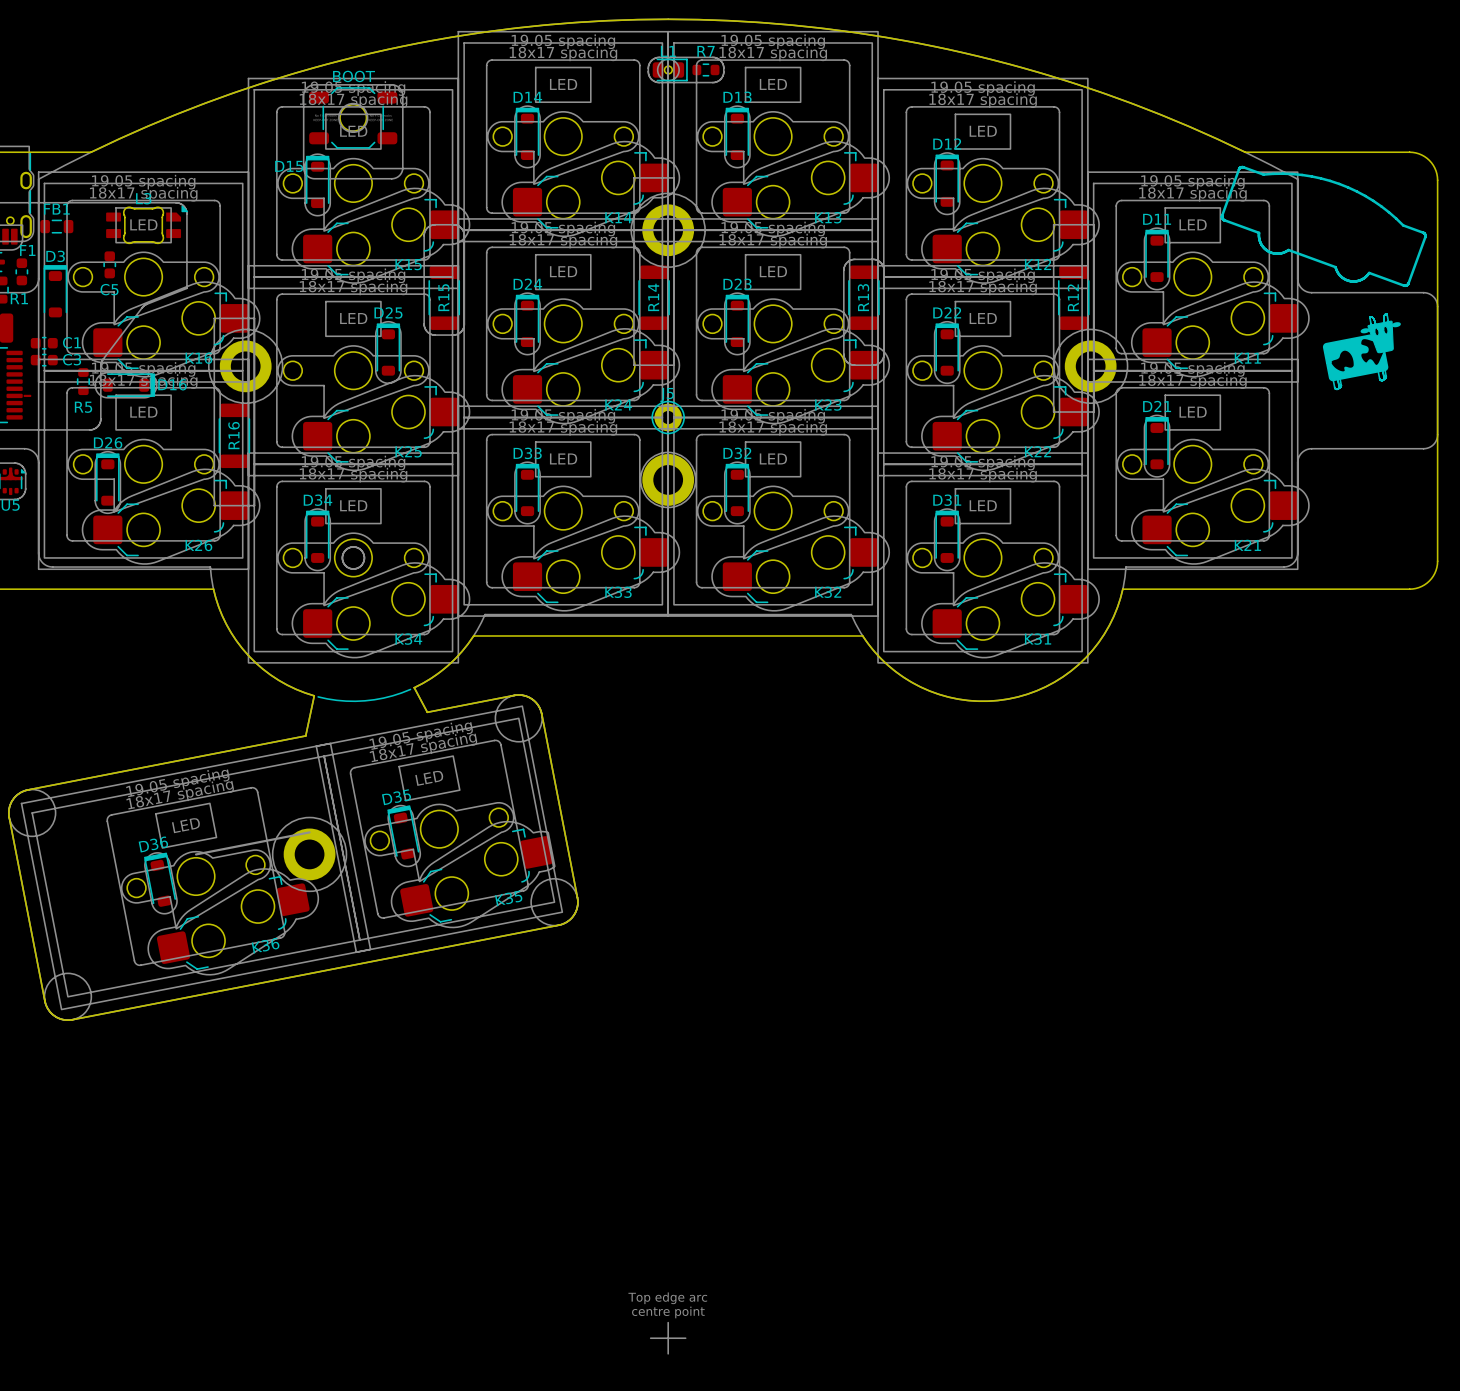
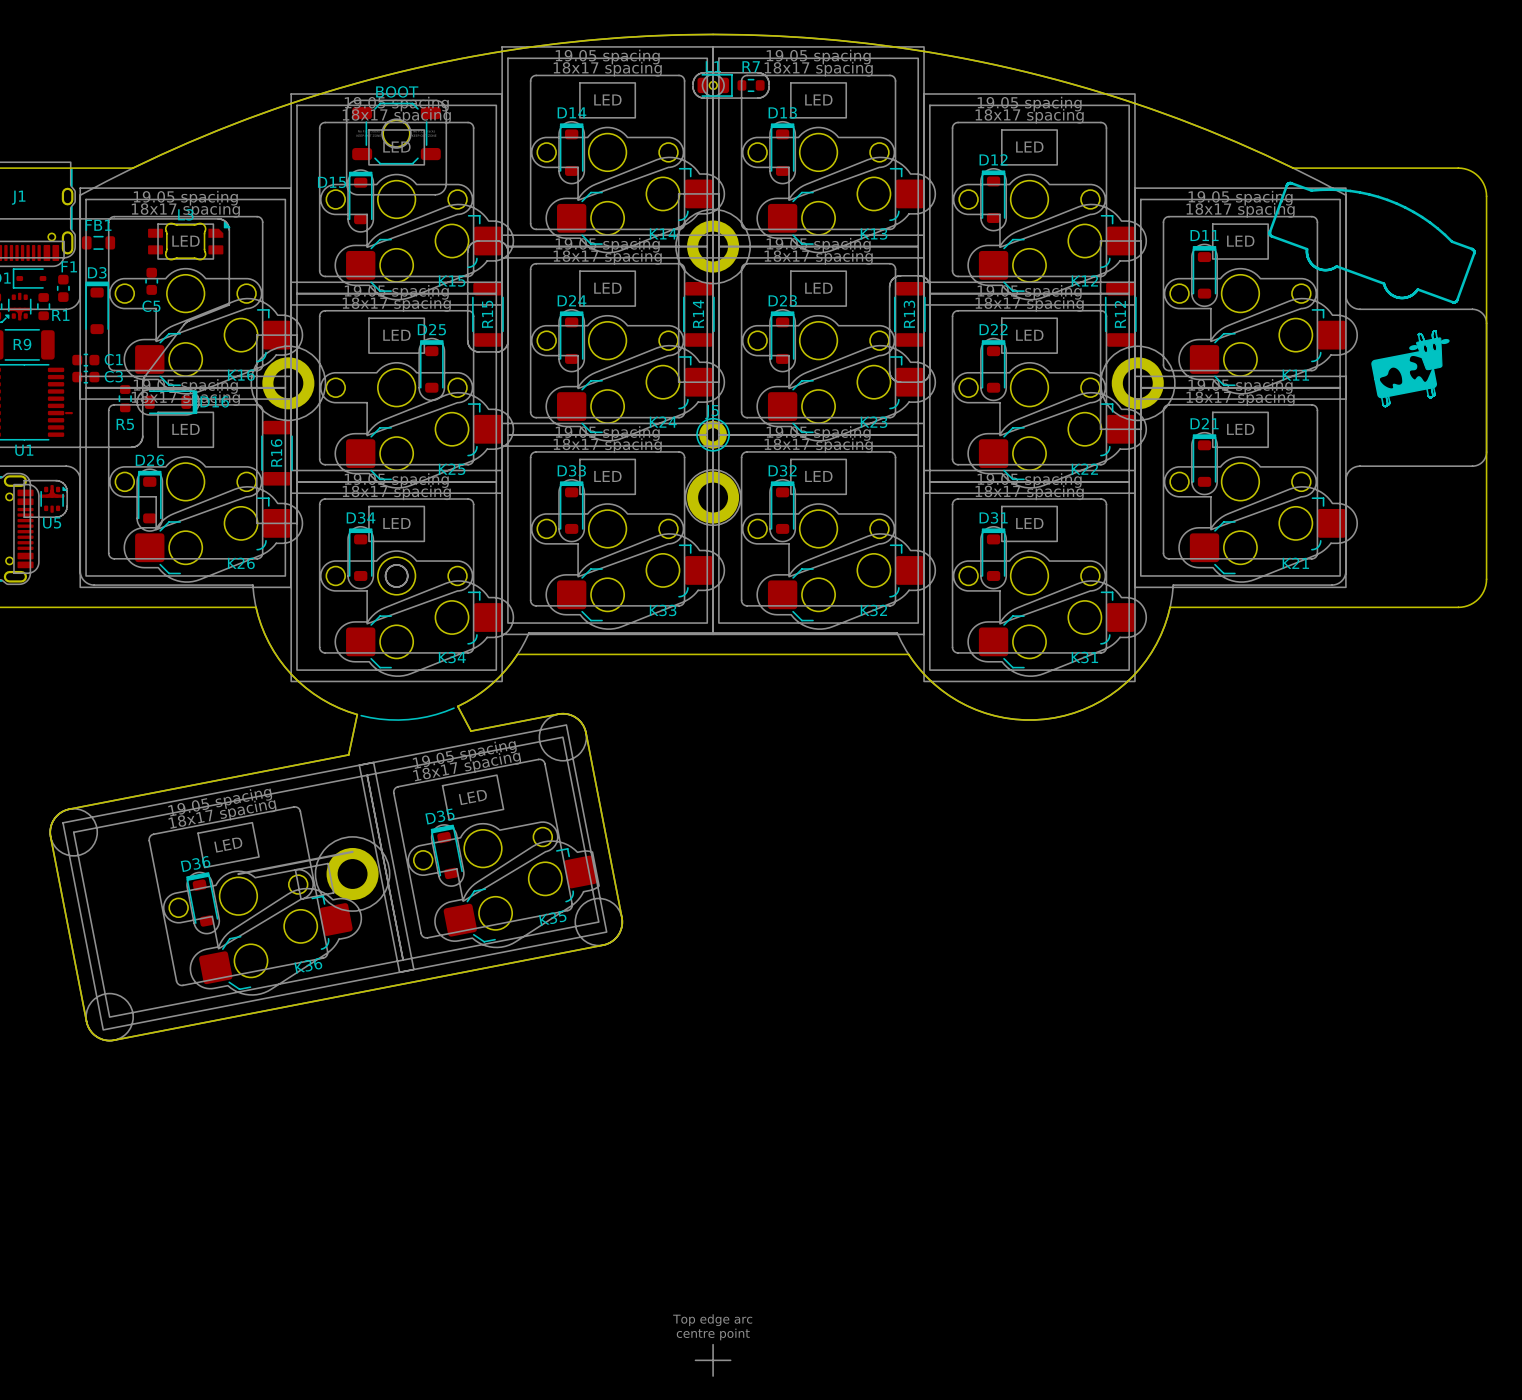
line: none -> (327, 863) (295, 869) (301, 899) (333, 892) (327, 863)

